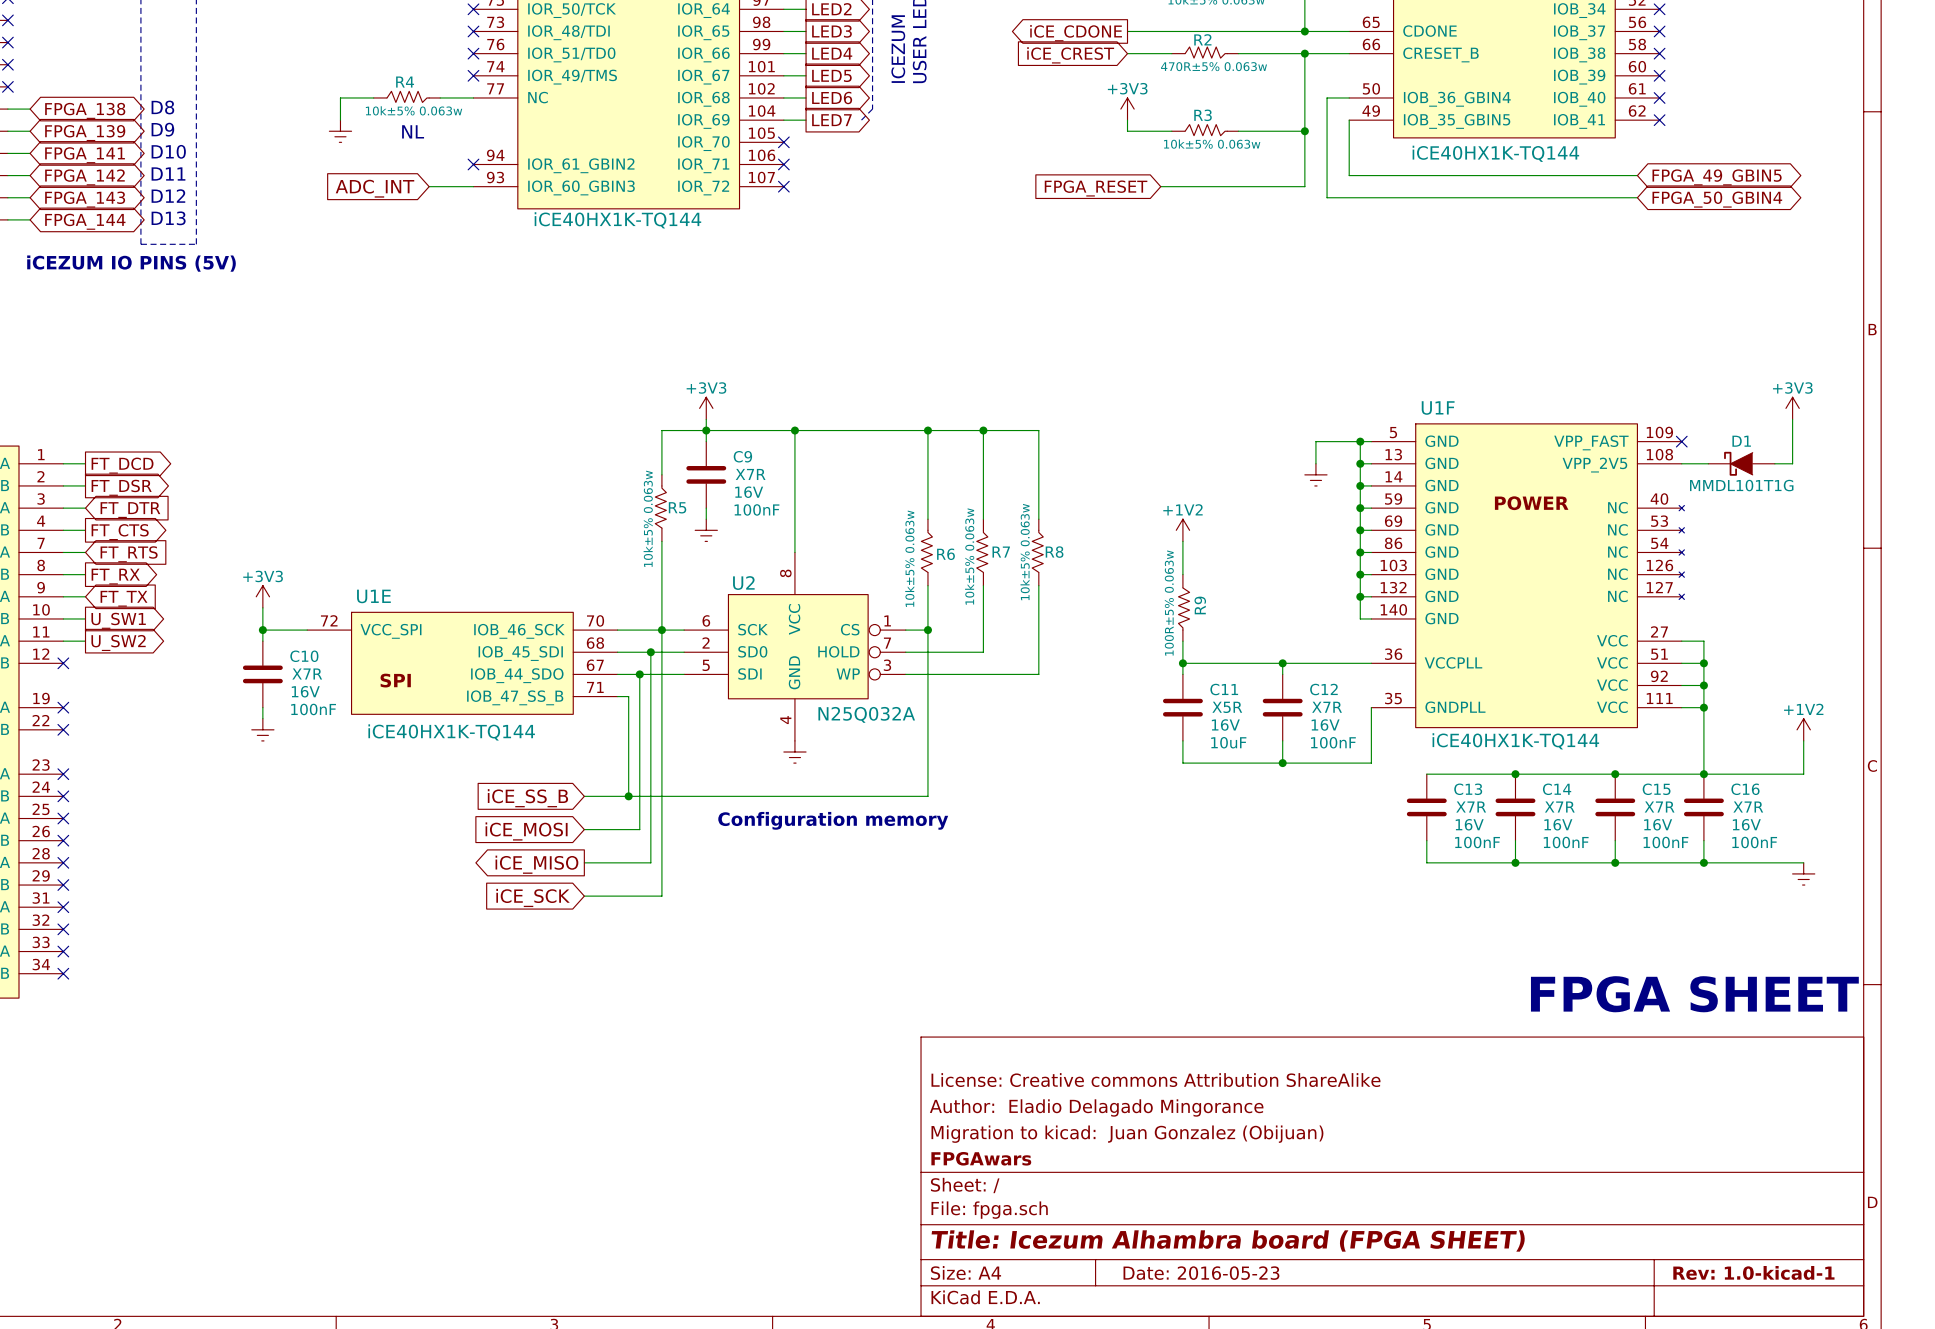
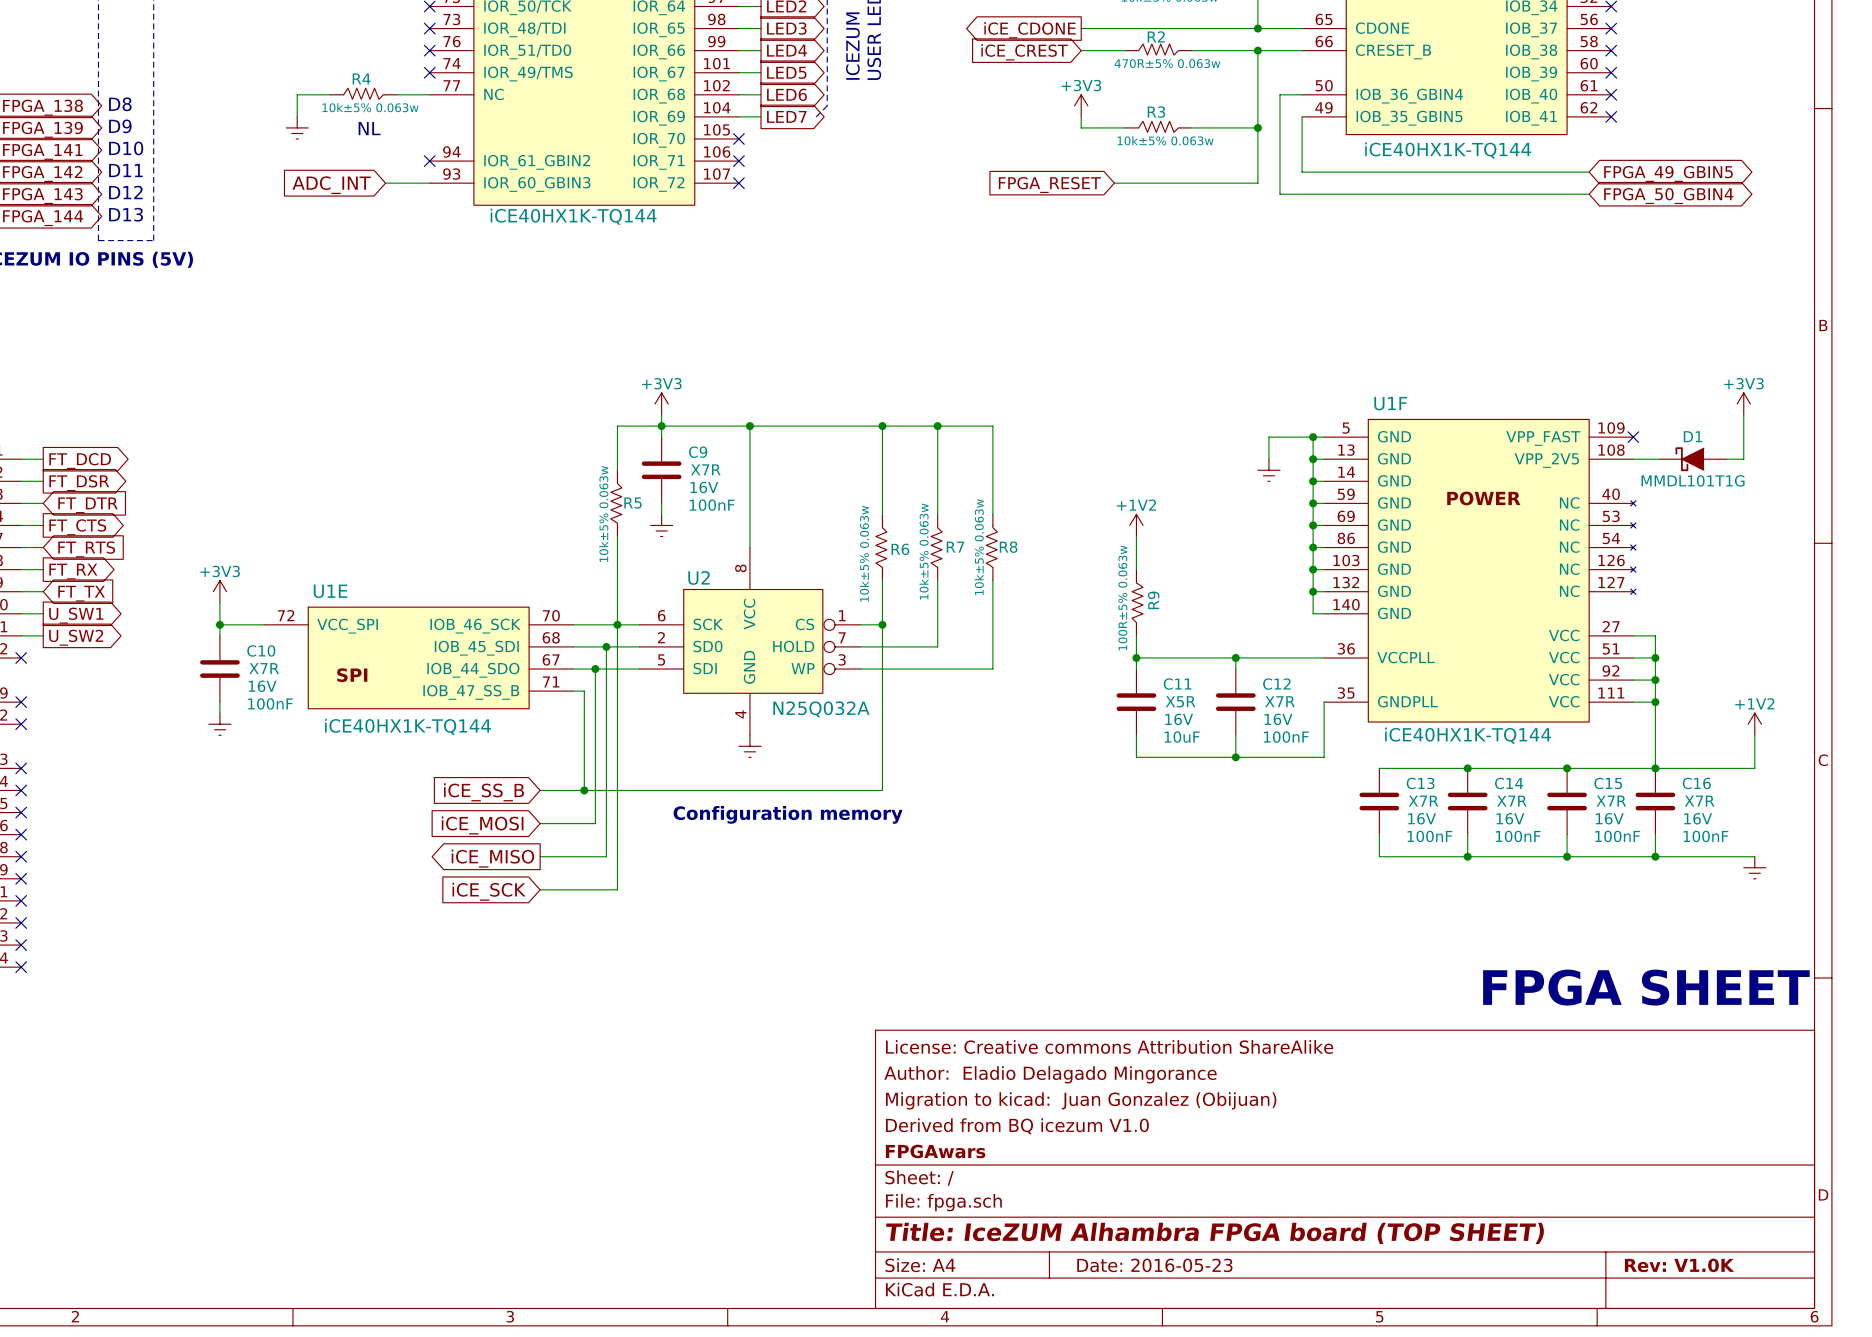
title block: none -> License: Creative commons Attribution ShareAlike (1109, 1046)
title block: License: Creative commons Attribution ShareAlike (1155, 1080) -> Author: Eladio Delagado Mingorance (1050, 1074)
title block: Author: Eladio Delagado Mingorance (1096, 1107) -> Migration to kicad: Juan Gonzalez (Obijuan) (1081, 1100)
title block: Migration to kicad: Juan Gonzalez (Obijuan) (1127, 1134) -> Derived from BQ icezum V1.0 (1017, 1126)
title block: Title: Icezum Alhambra board (FPGA SHEET) (1228, 1240) -> Title: IceZUM Alhambra FPGA board (TOP SHEET) (1215, 1233)
title block: Rev: 1.0-kicad-1 (1753, 1272) -> Rev: V1.0K (1679, 1265)

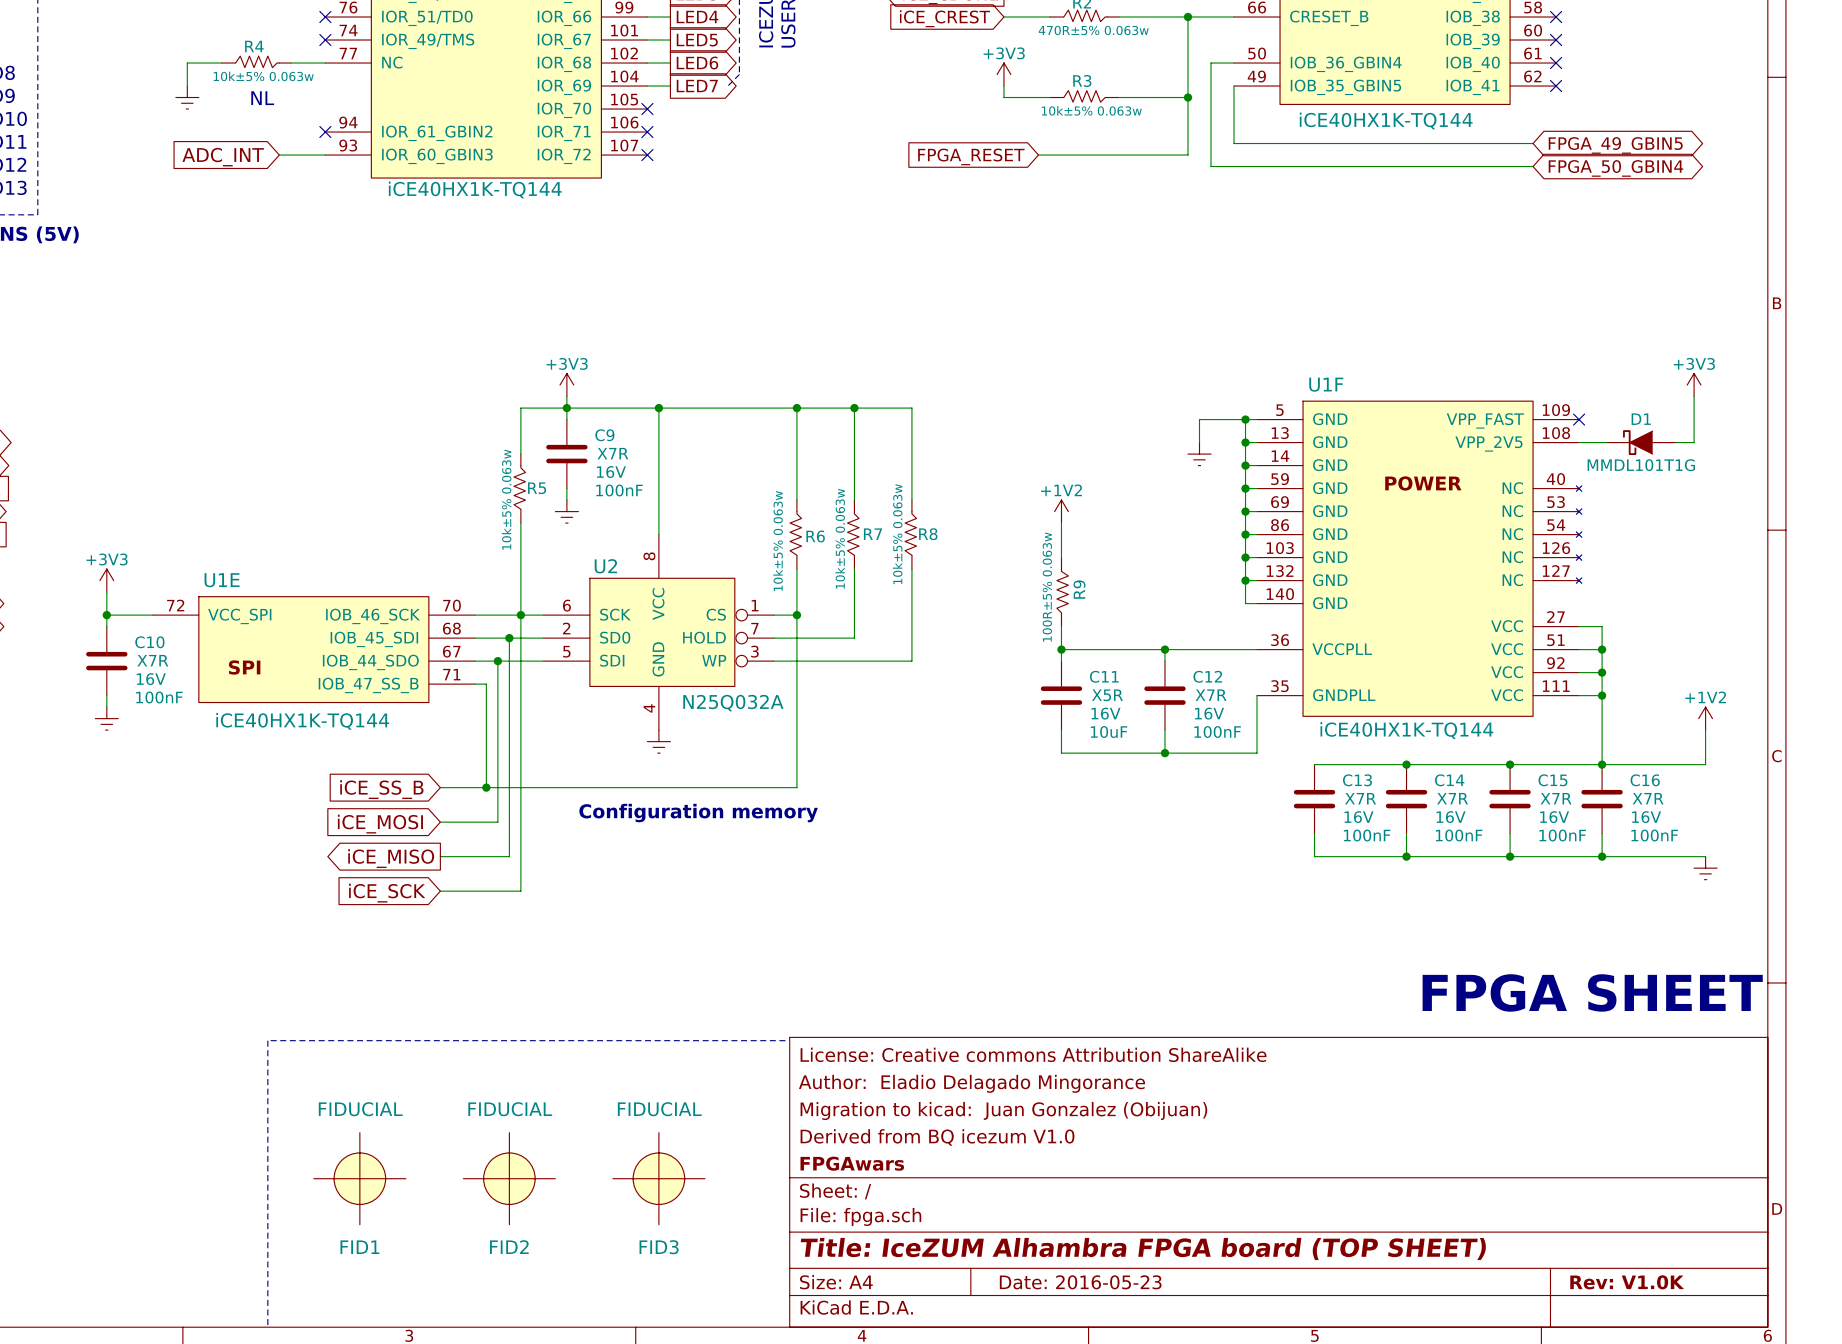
line: none -> (785, 1040) (267, 1040) (267, 1328)
FID1: none -> FIDUCIAL (359, 1178)
FID2: none -> FIDUCIAL (509, 1178)
FID3: none -> FIDUCIAL (658, 1178)

